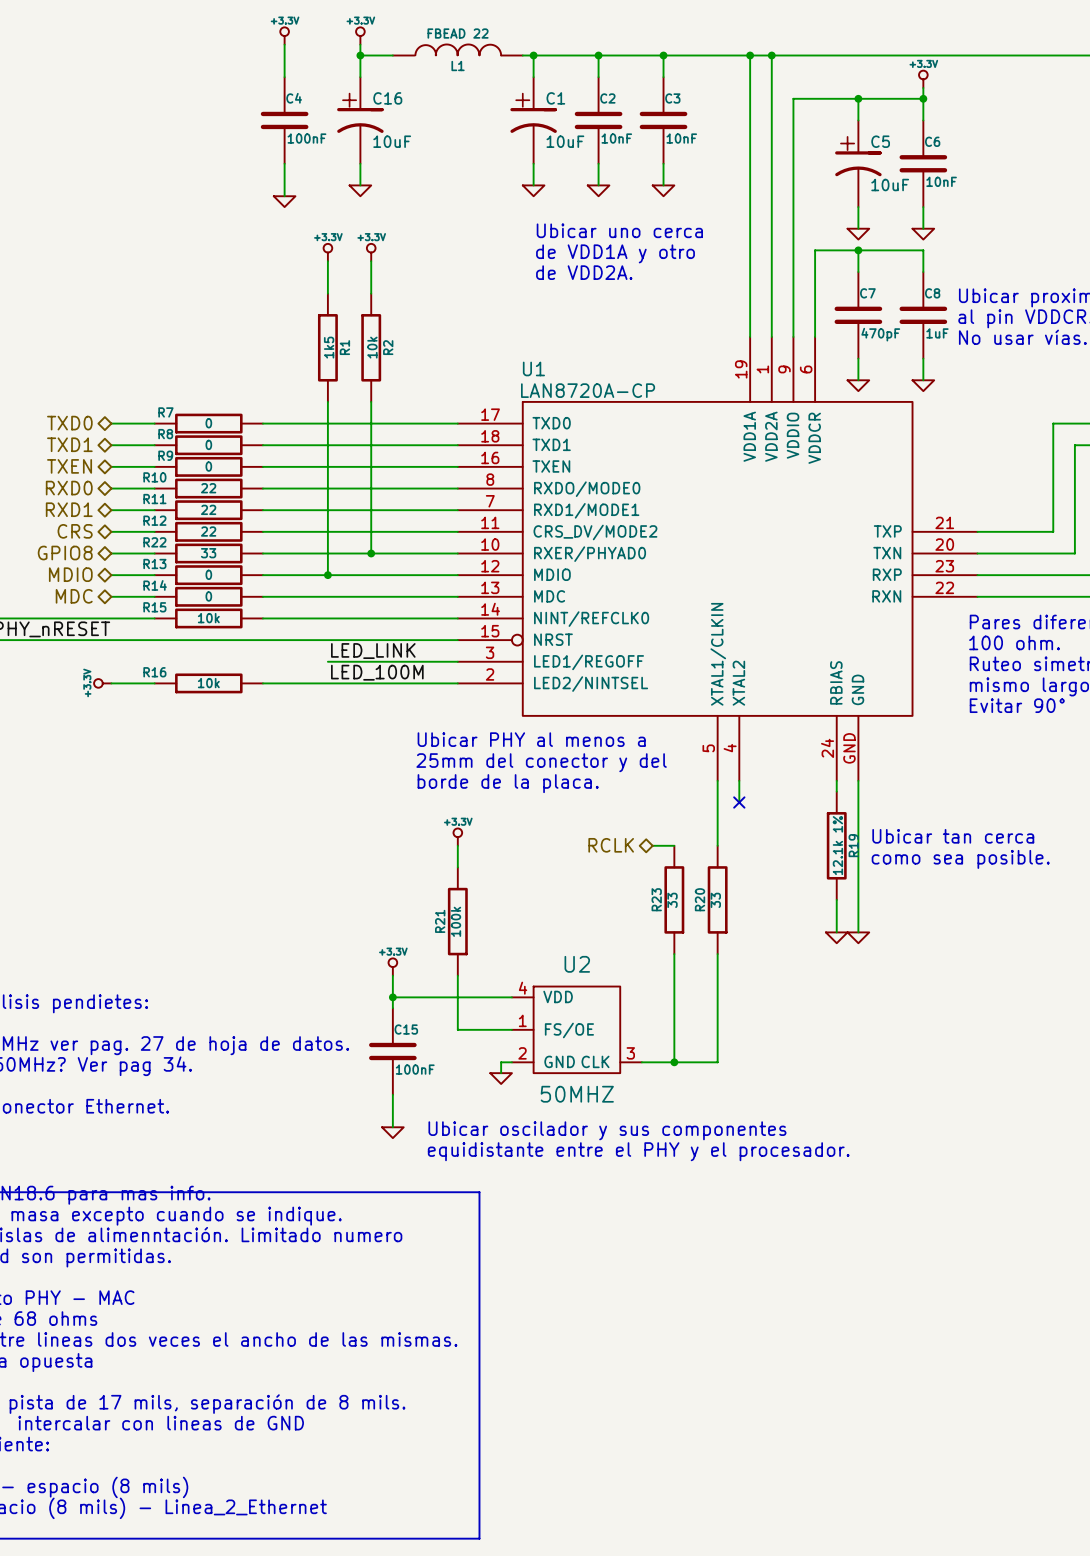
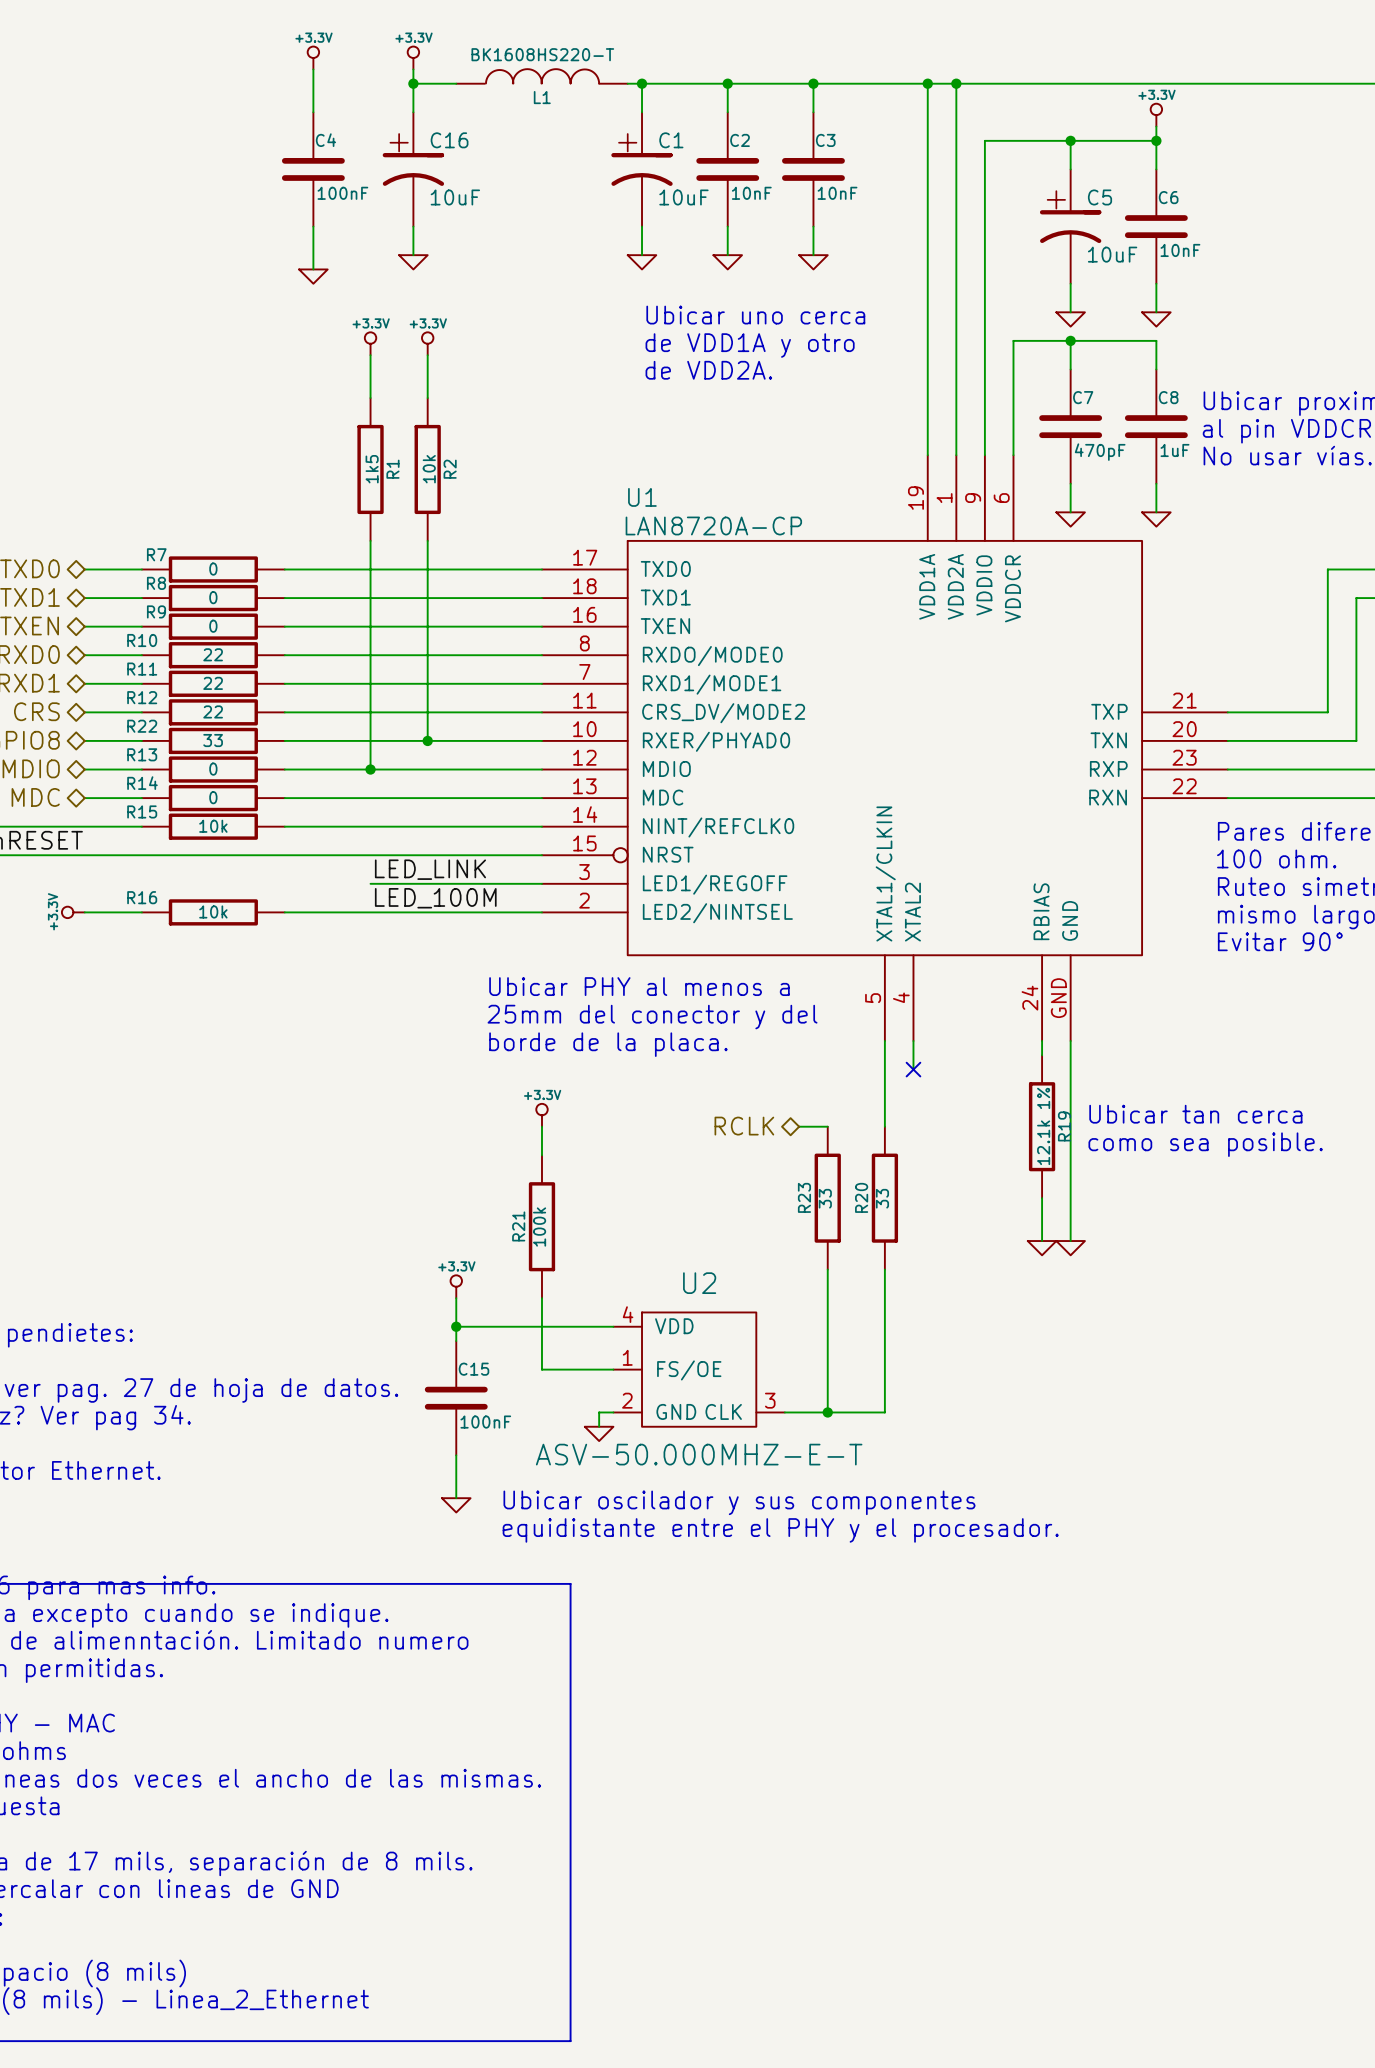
L1 value: FBEAD 22 (458, 33) -> BK1608HS220-T (542, 54)
U2 value: 50MHZ (577, 1094) -> ASV-50.000MHZ-E-T (699, 1454)

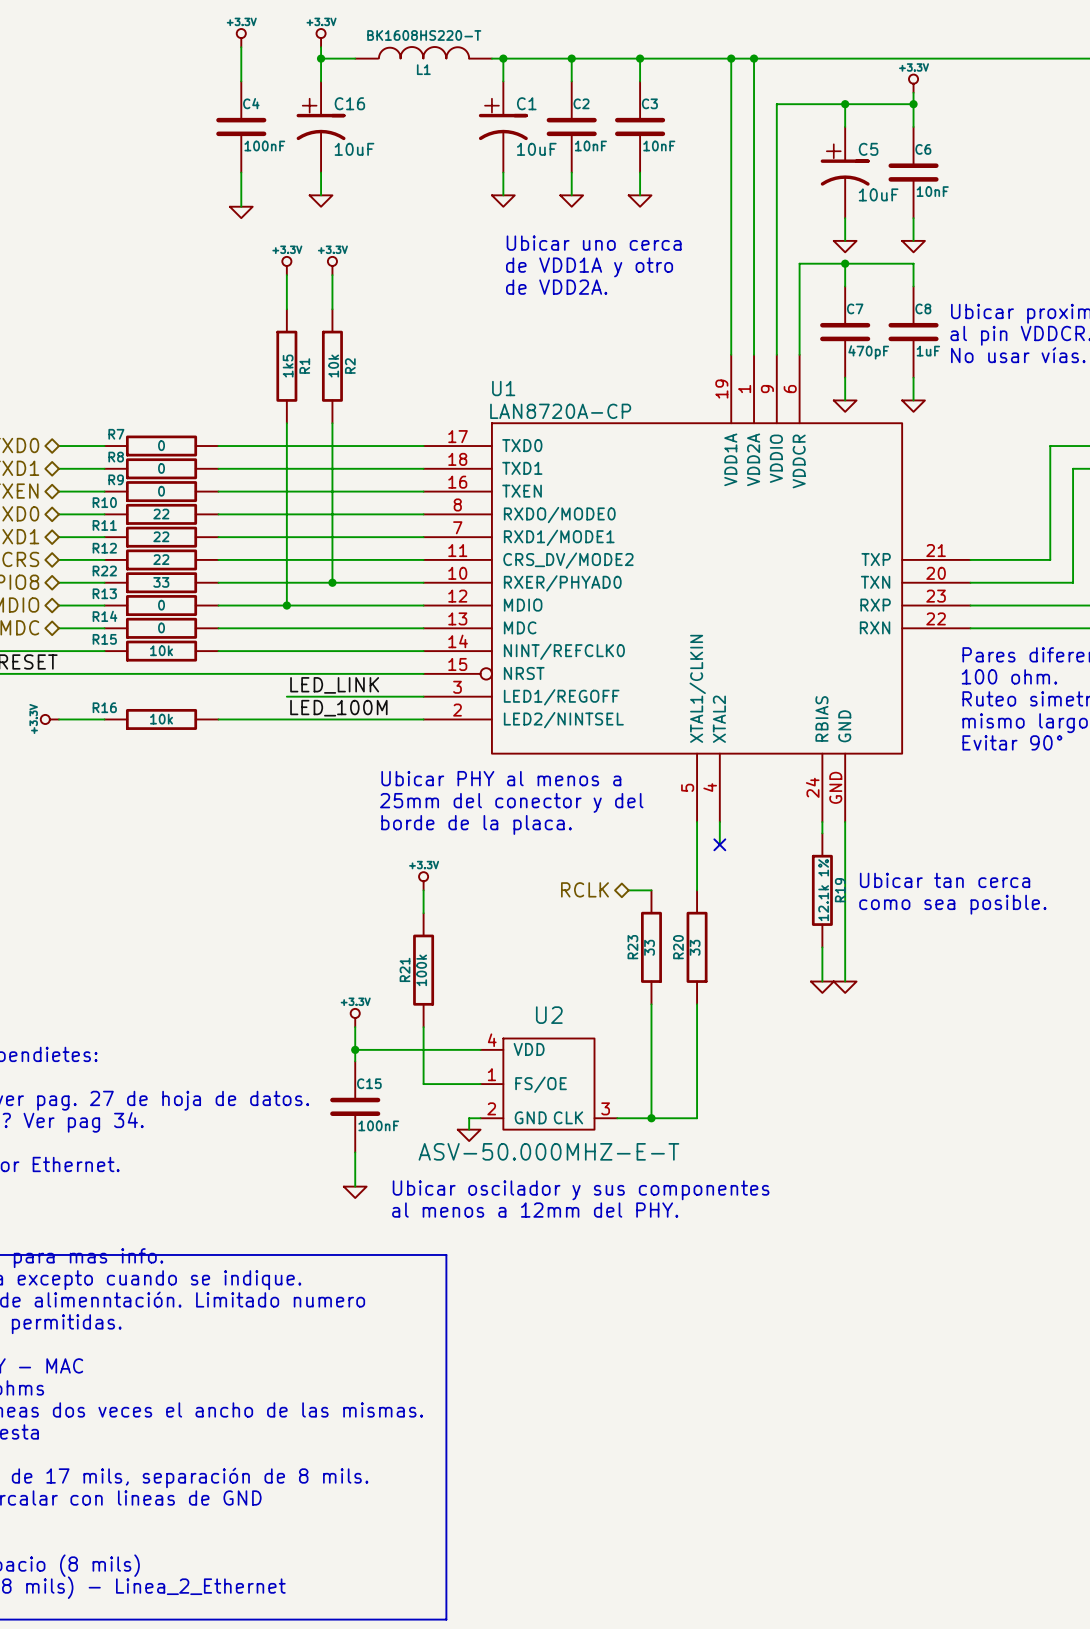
text: equidistante entre el PHY y el procesador. (780, 1530) -> al menos a 12mm del PHY. (535, 1210)

